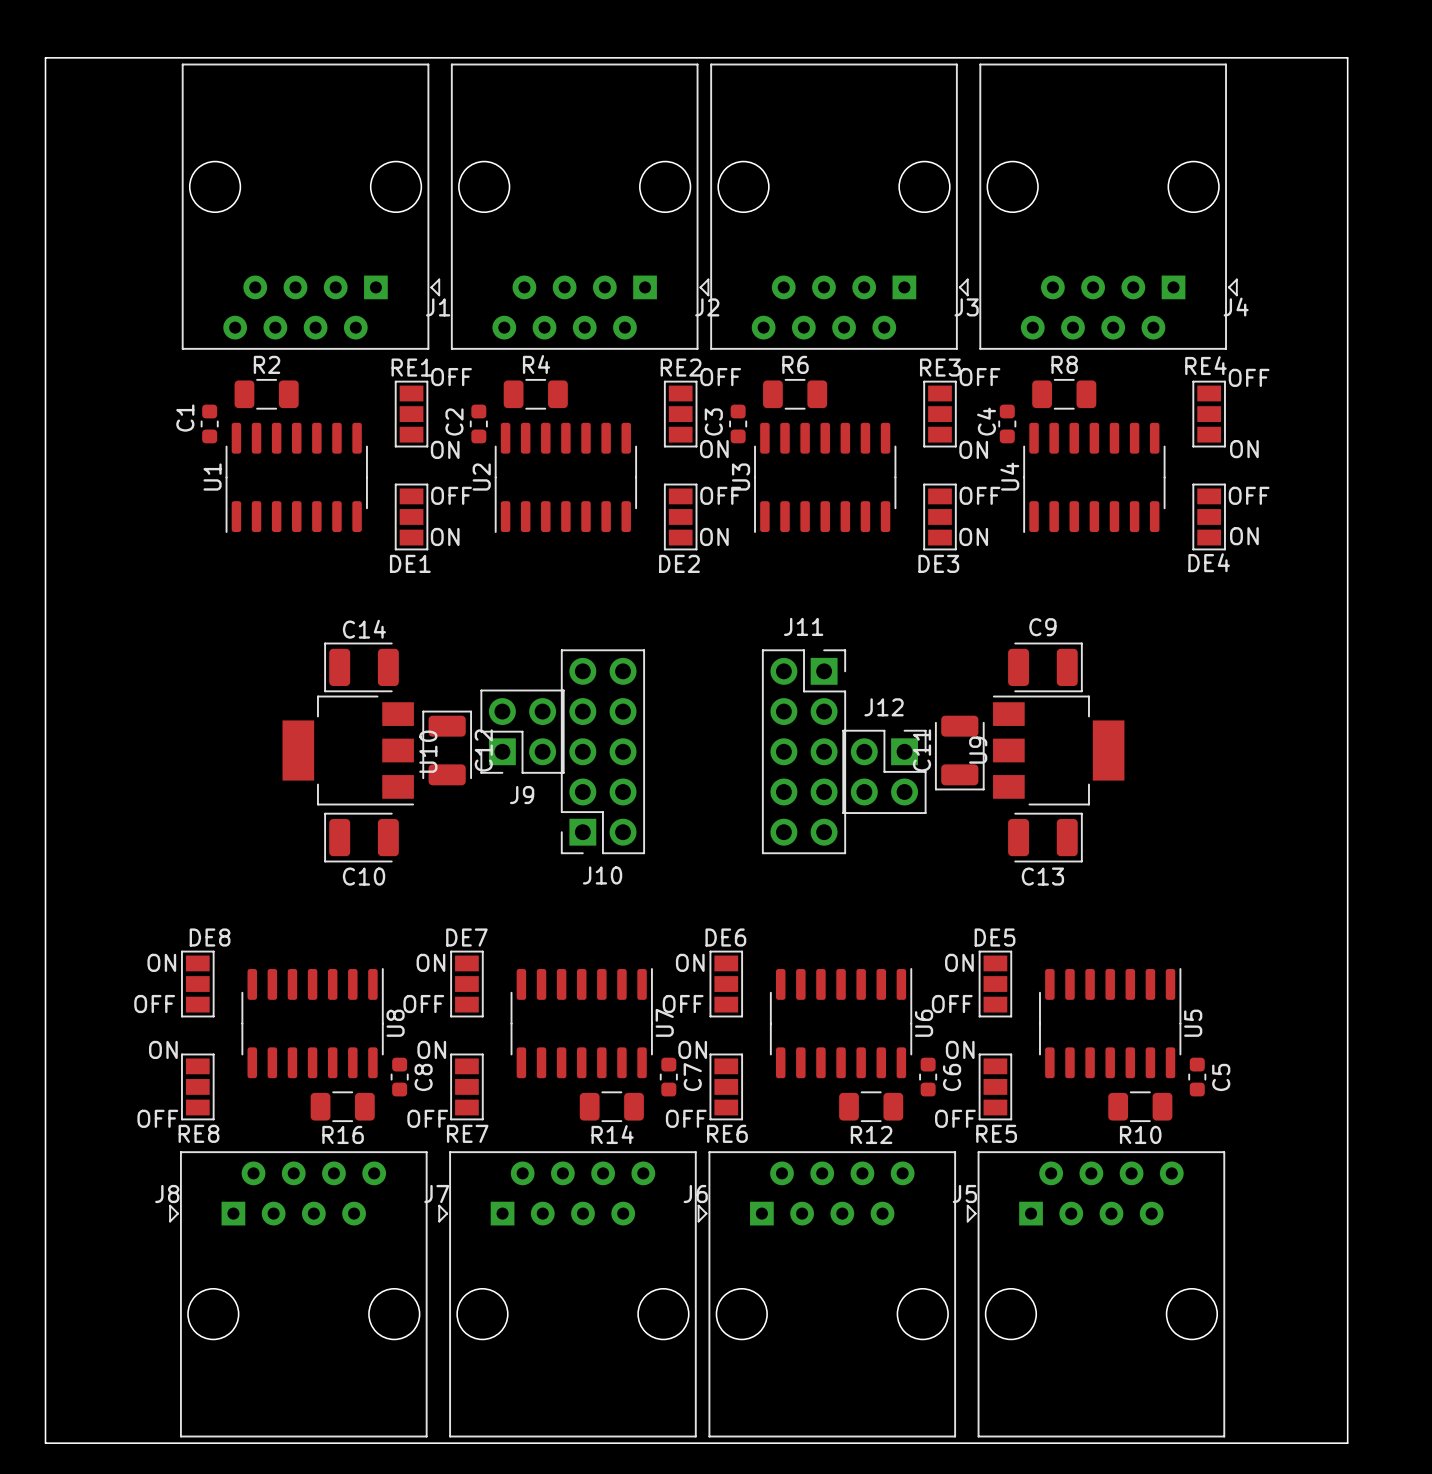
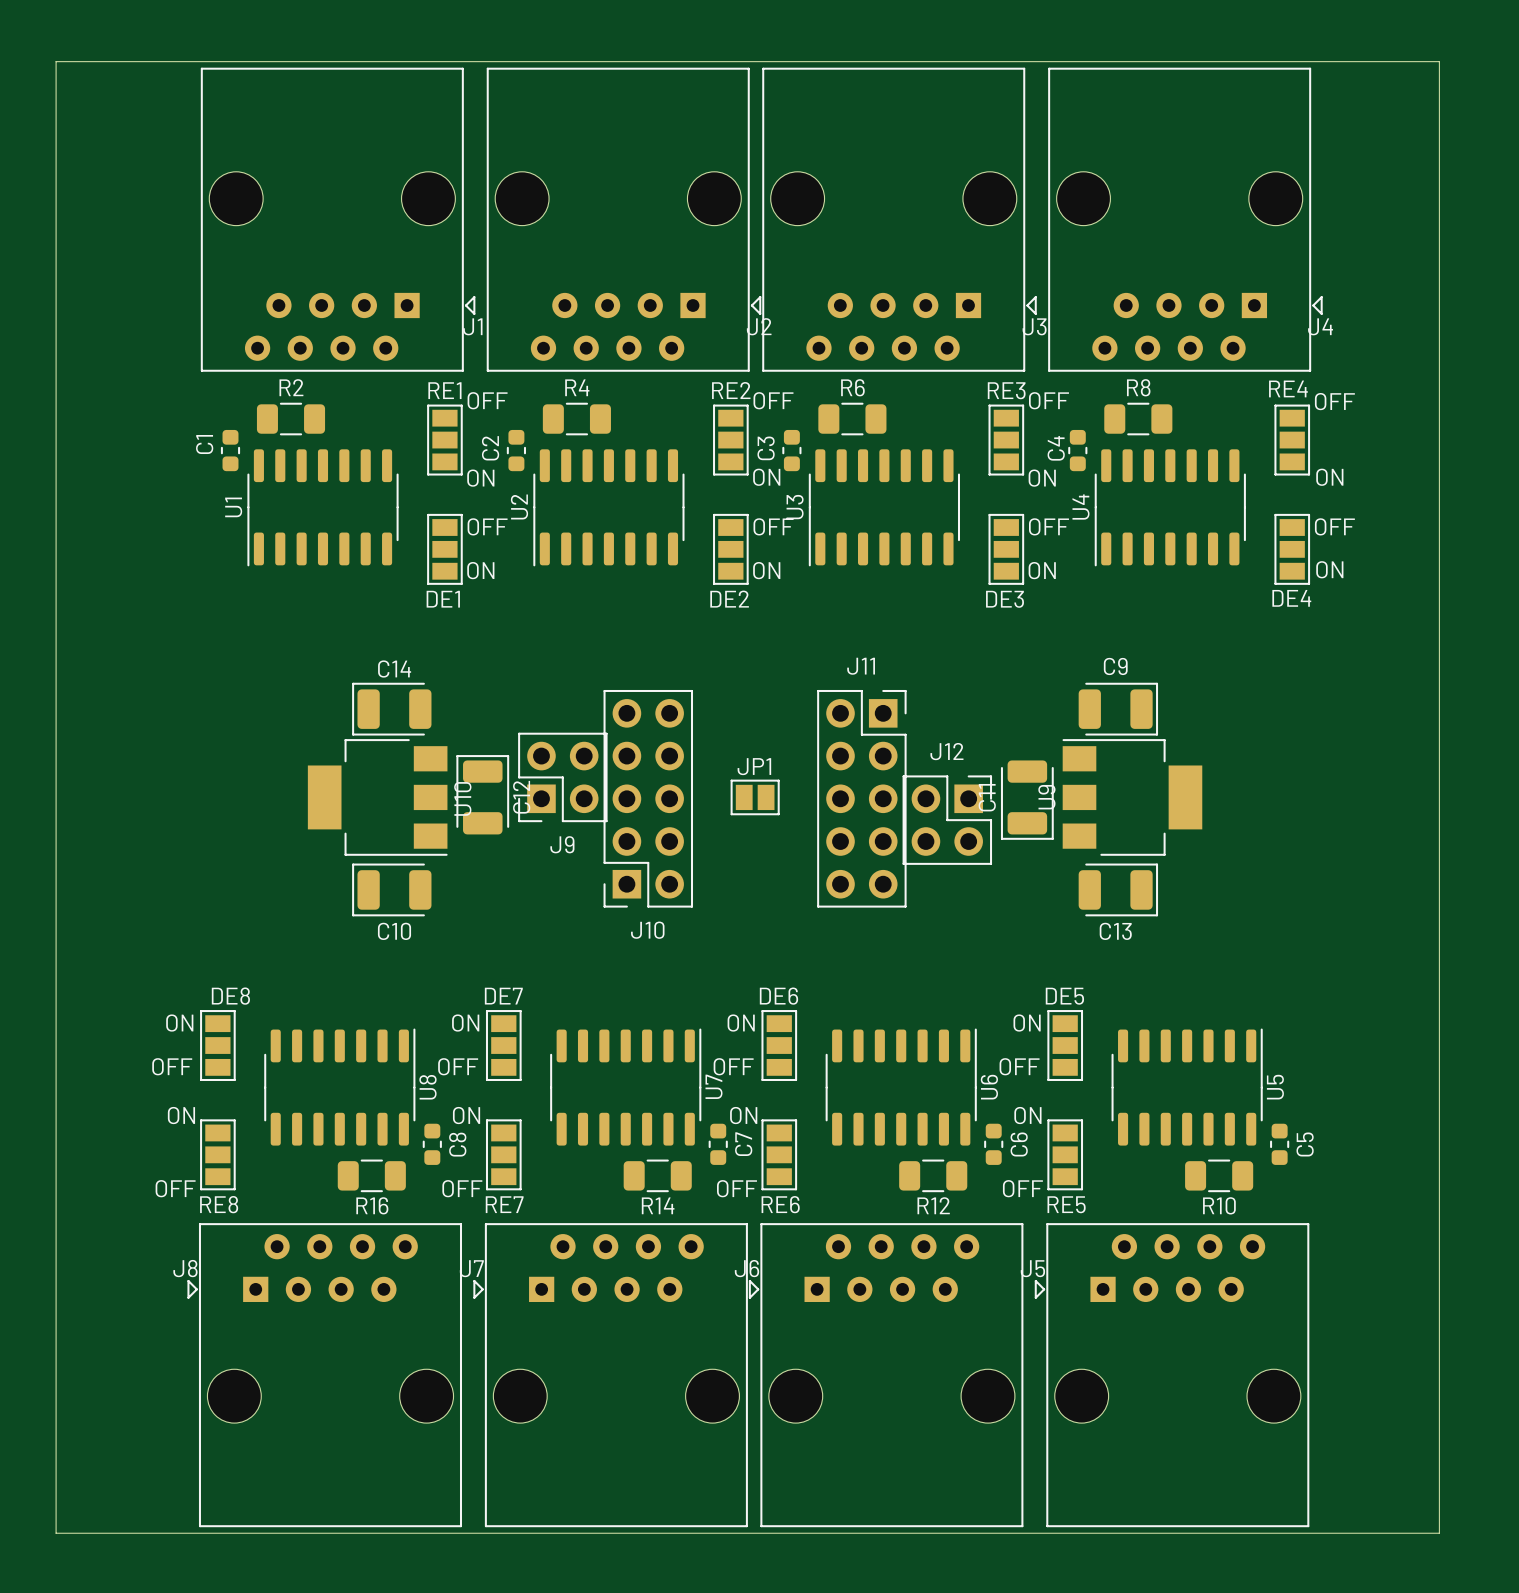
JP1: none -> (755, 797)

